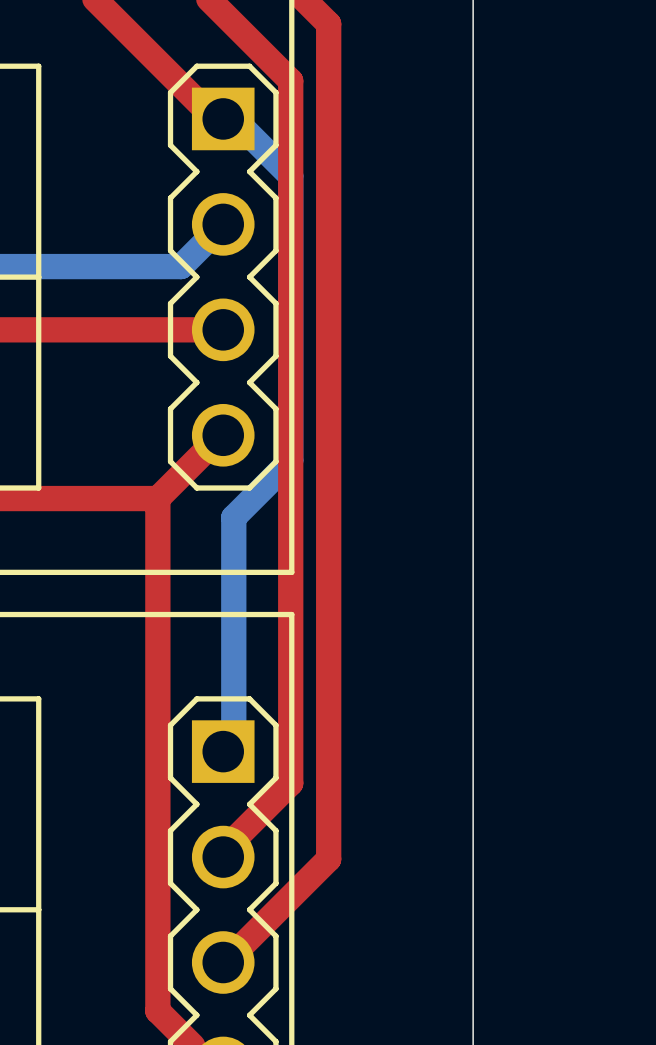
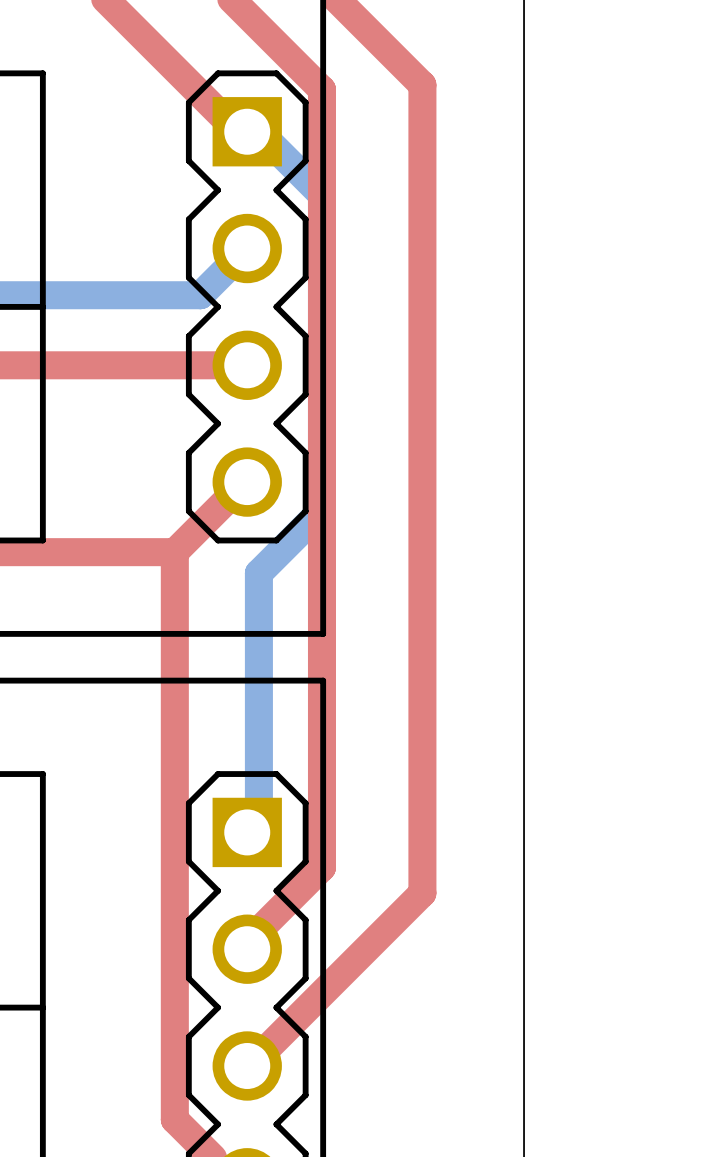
top track: (328, 24) (328, 859) -> (364, 26) (422, 85) (422, 893) (364, 951)

